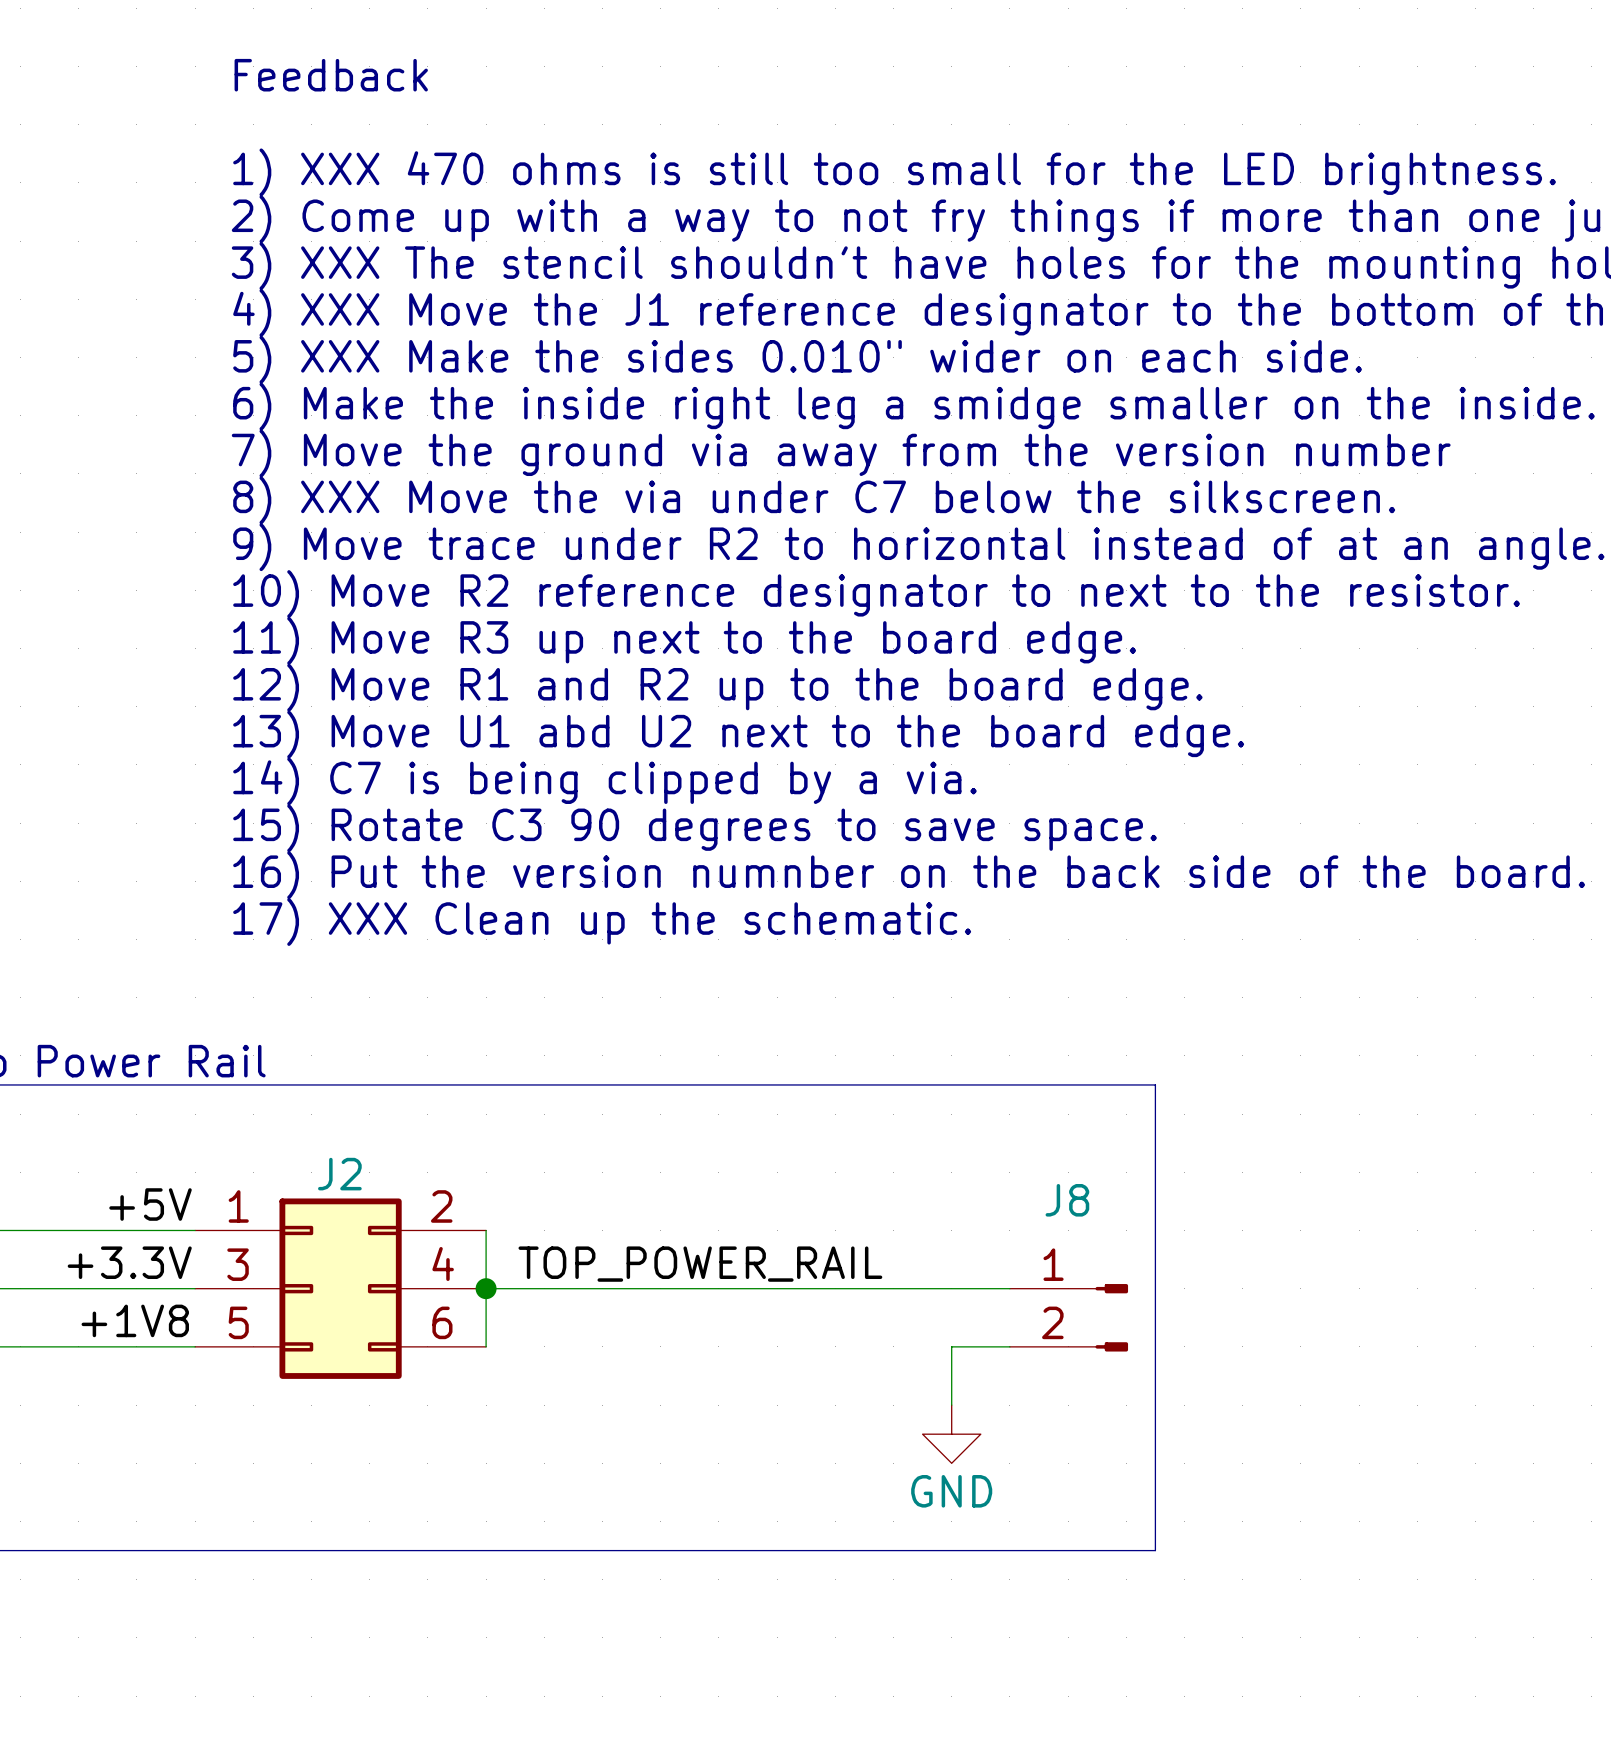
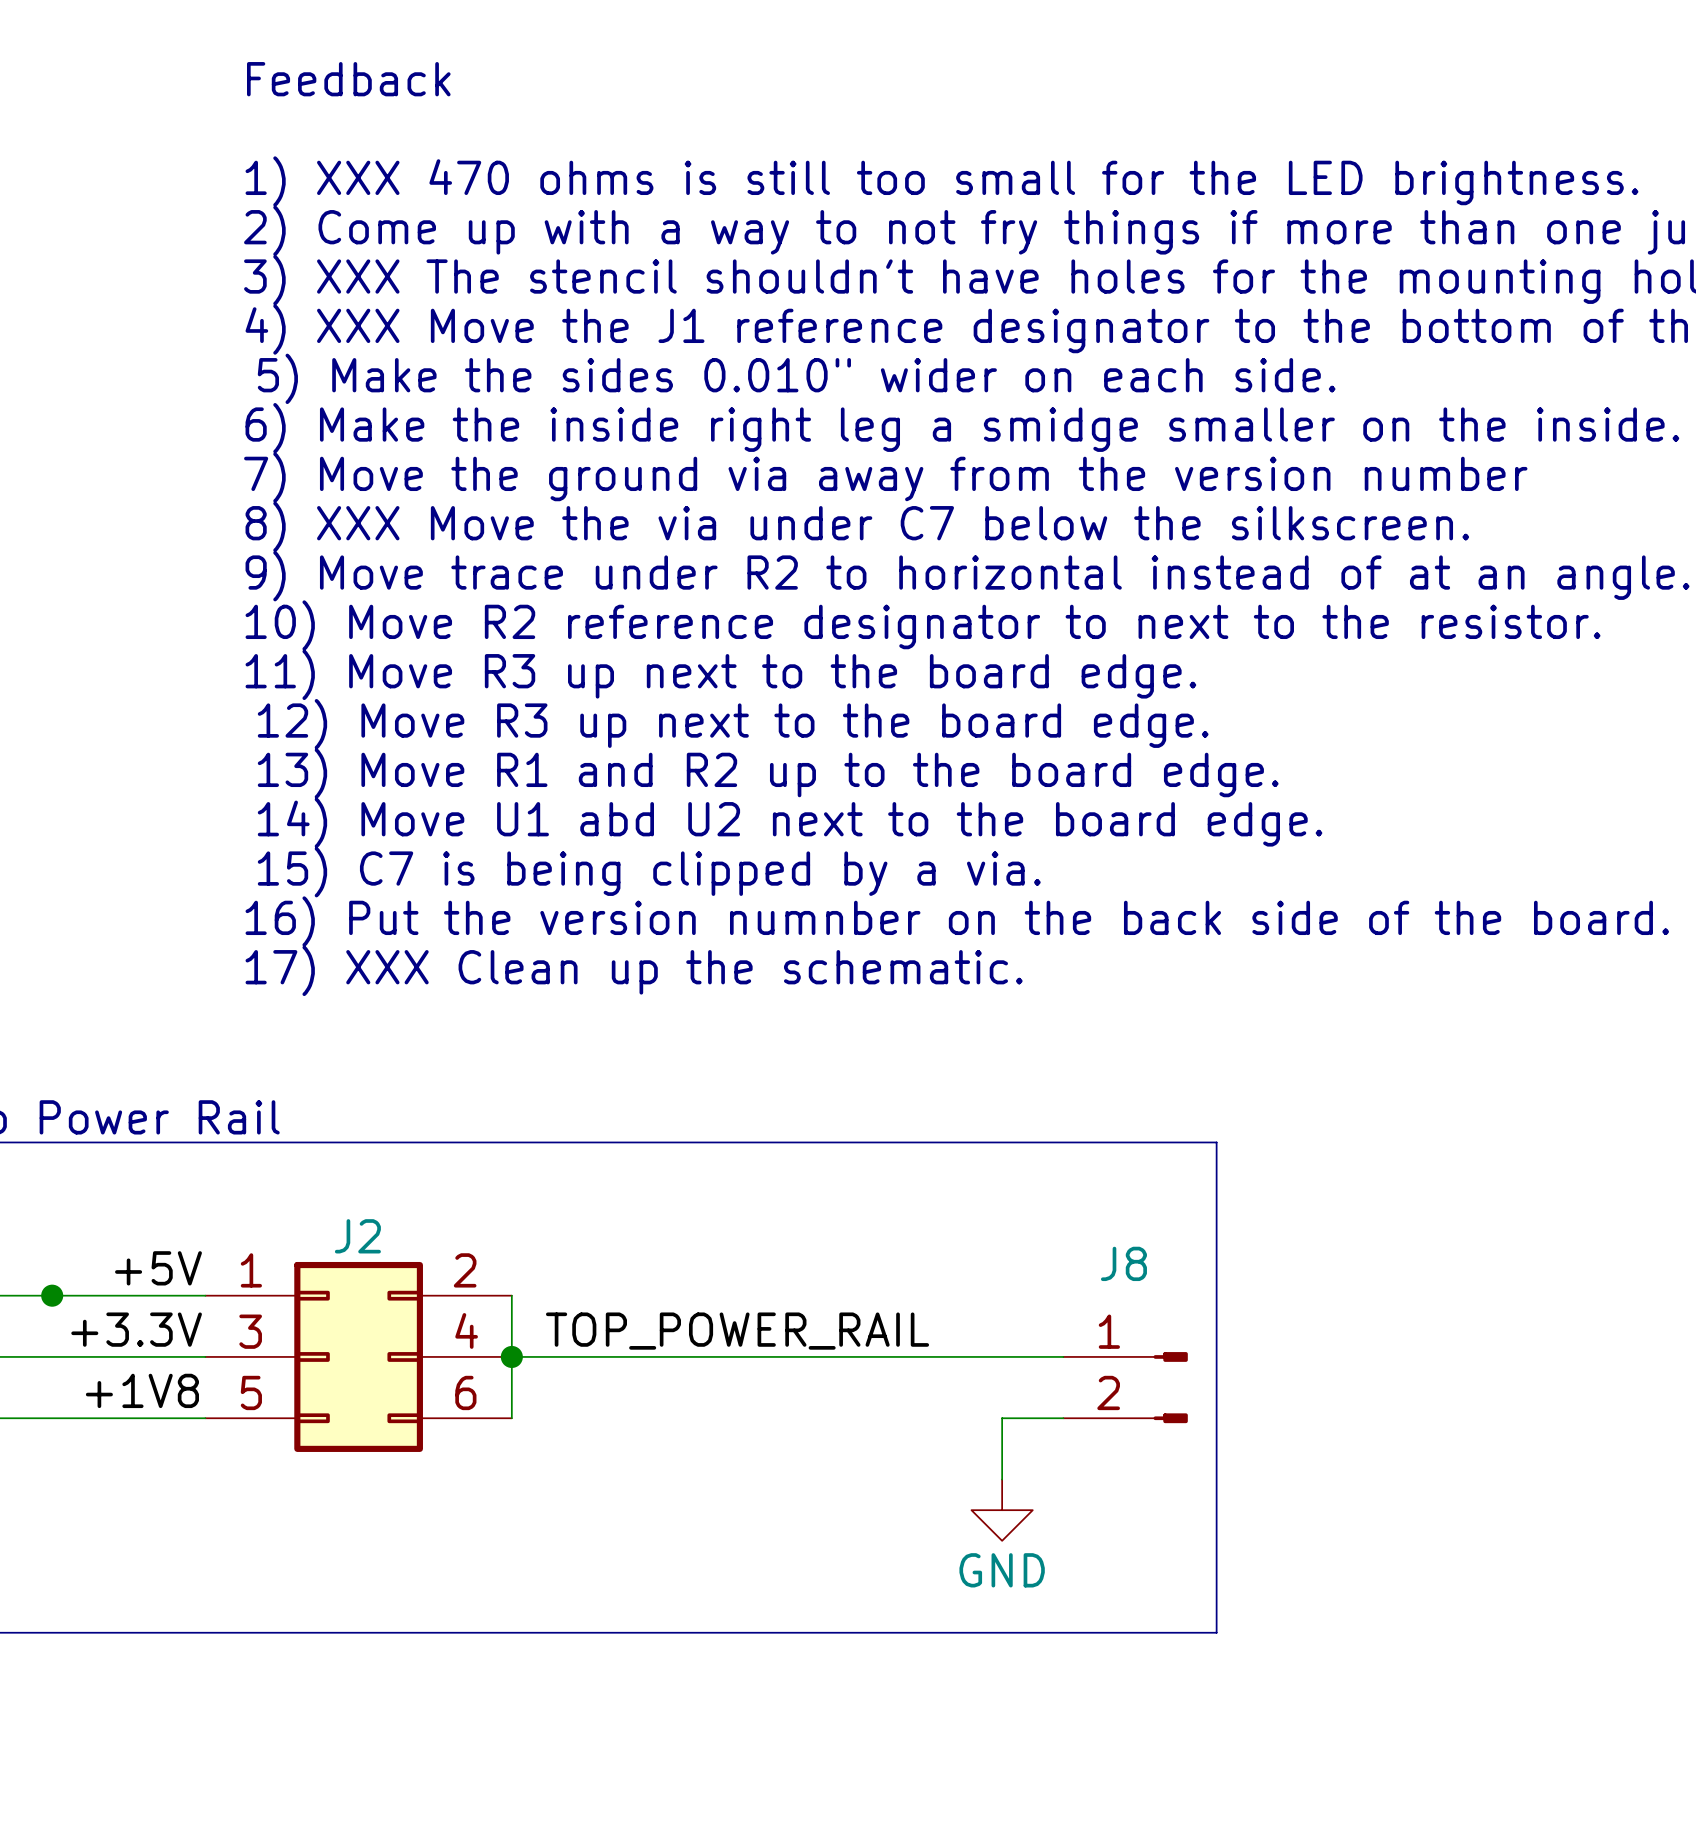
text: 5) XXX Make the sides 0.010" wider on each side. (797, 359) -> 5) Make the sides 0.010" wider on each side. (796, 378)
text: 12) Move R1 and R2 up to the board edge. (717, 687) -> 12) Move R3 up next to the board edge. (733, 724)
text: 13) Move U1 abd U2 next to the board edge. (738, 734) -> 13) Move R1 and R2 up to the board edge. (768, 773)
text: 14) C7 is being clipped by a via. (604, 781) -> 14) Move U1 abd U2 next to the board edge. (790, 822)
text: 15) Rotate C3 90 degrees to save space. (694, 828) -> 15) C7 is being clipped by a via. (649, 872)
junction: none -> (52, 1295)

